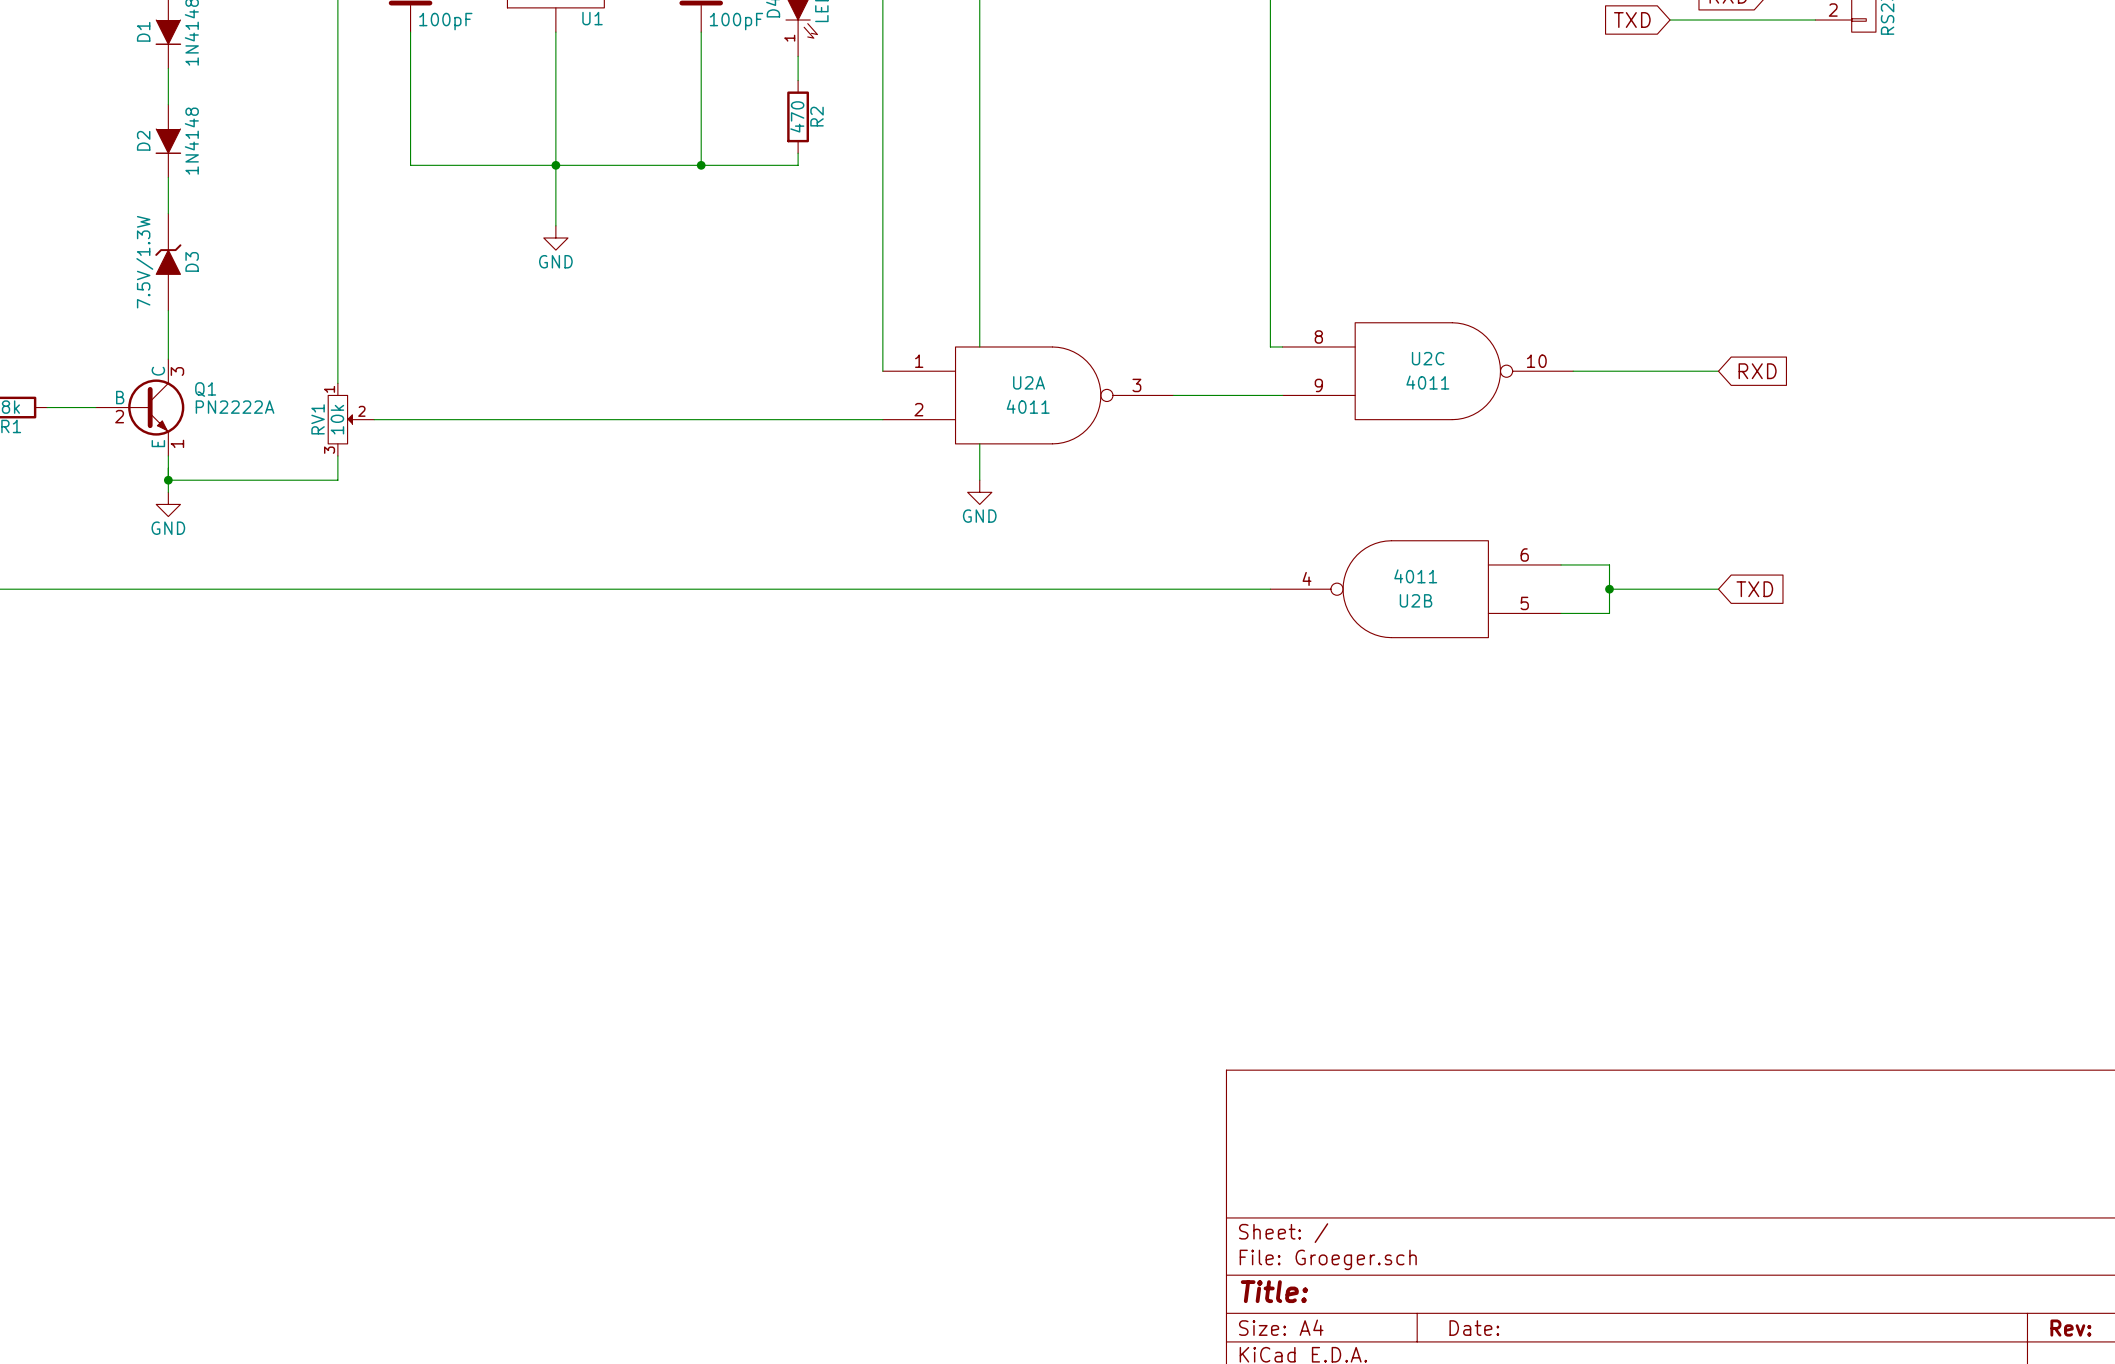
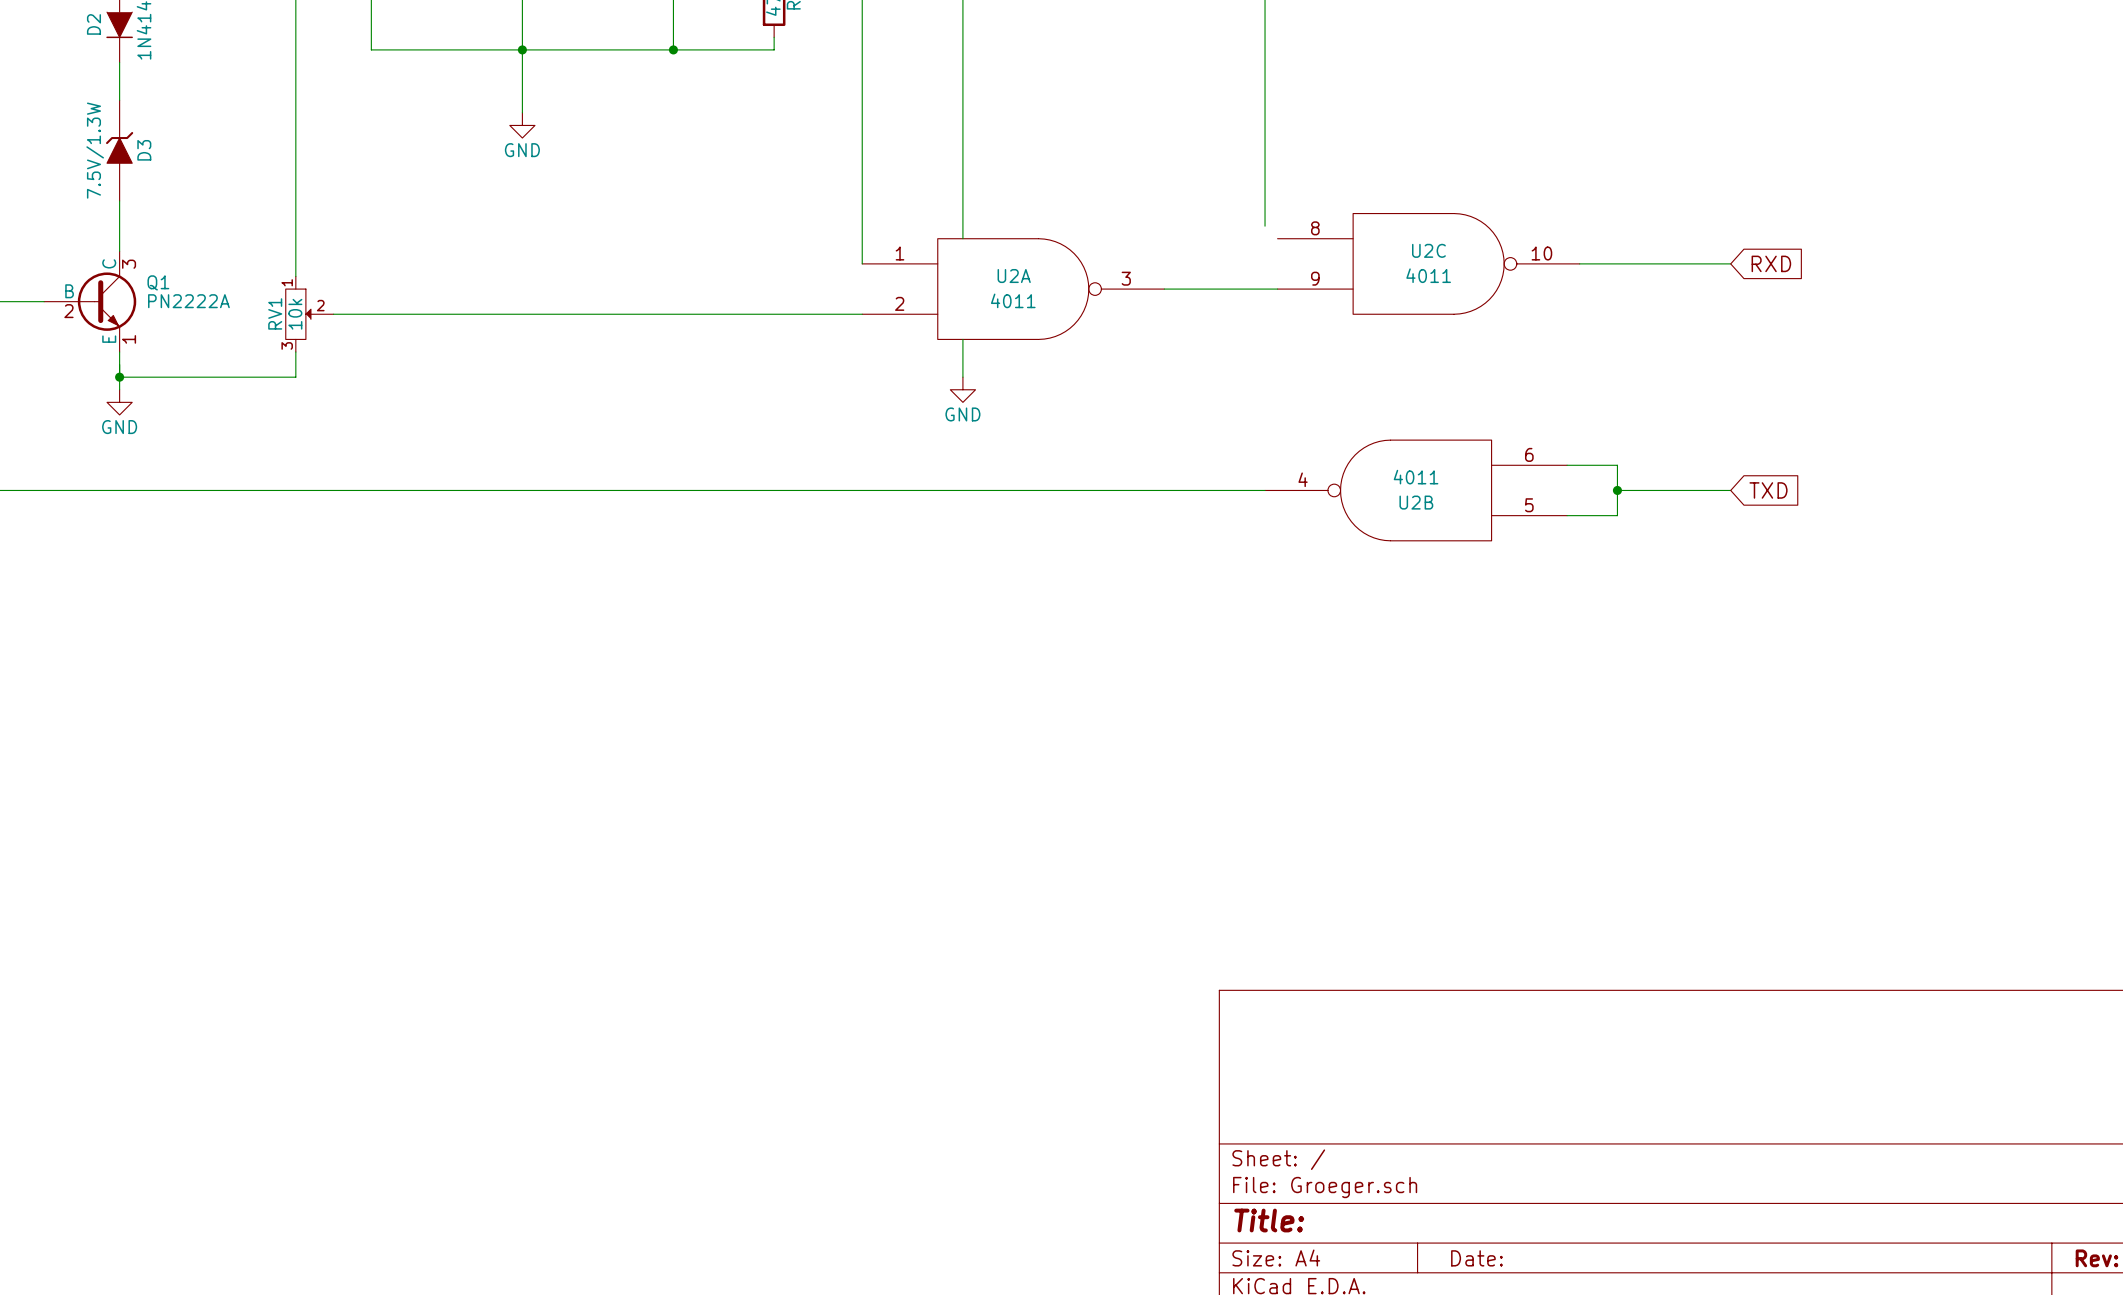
wire: (1270, 334) (1270, 346) (1282, 346) -> none

